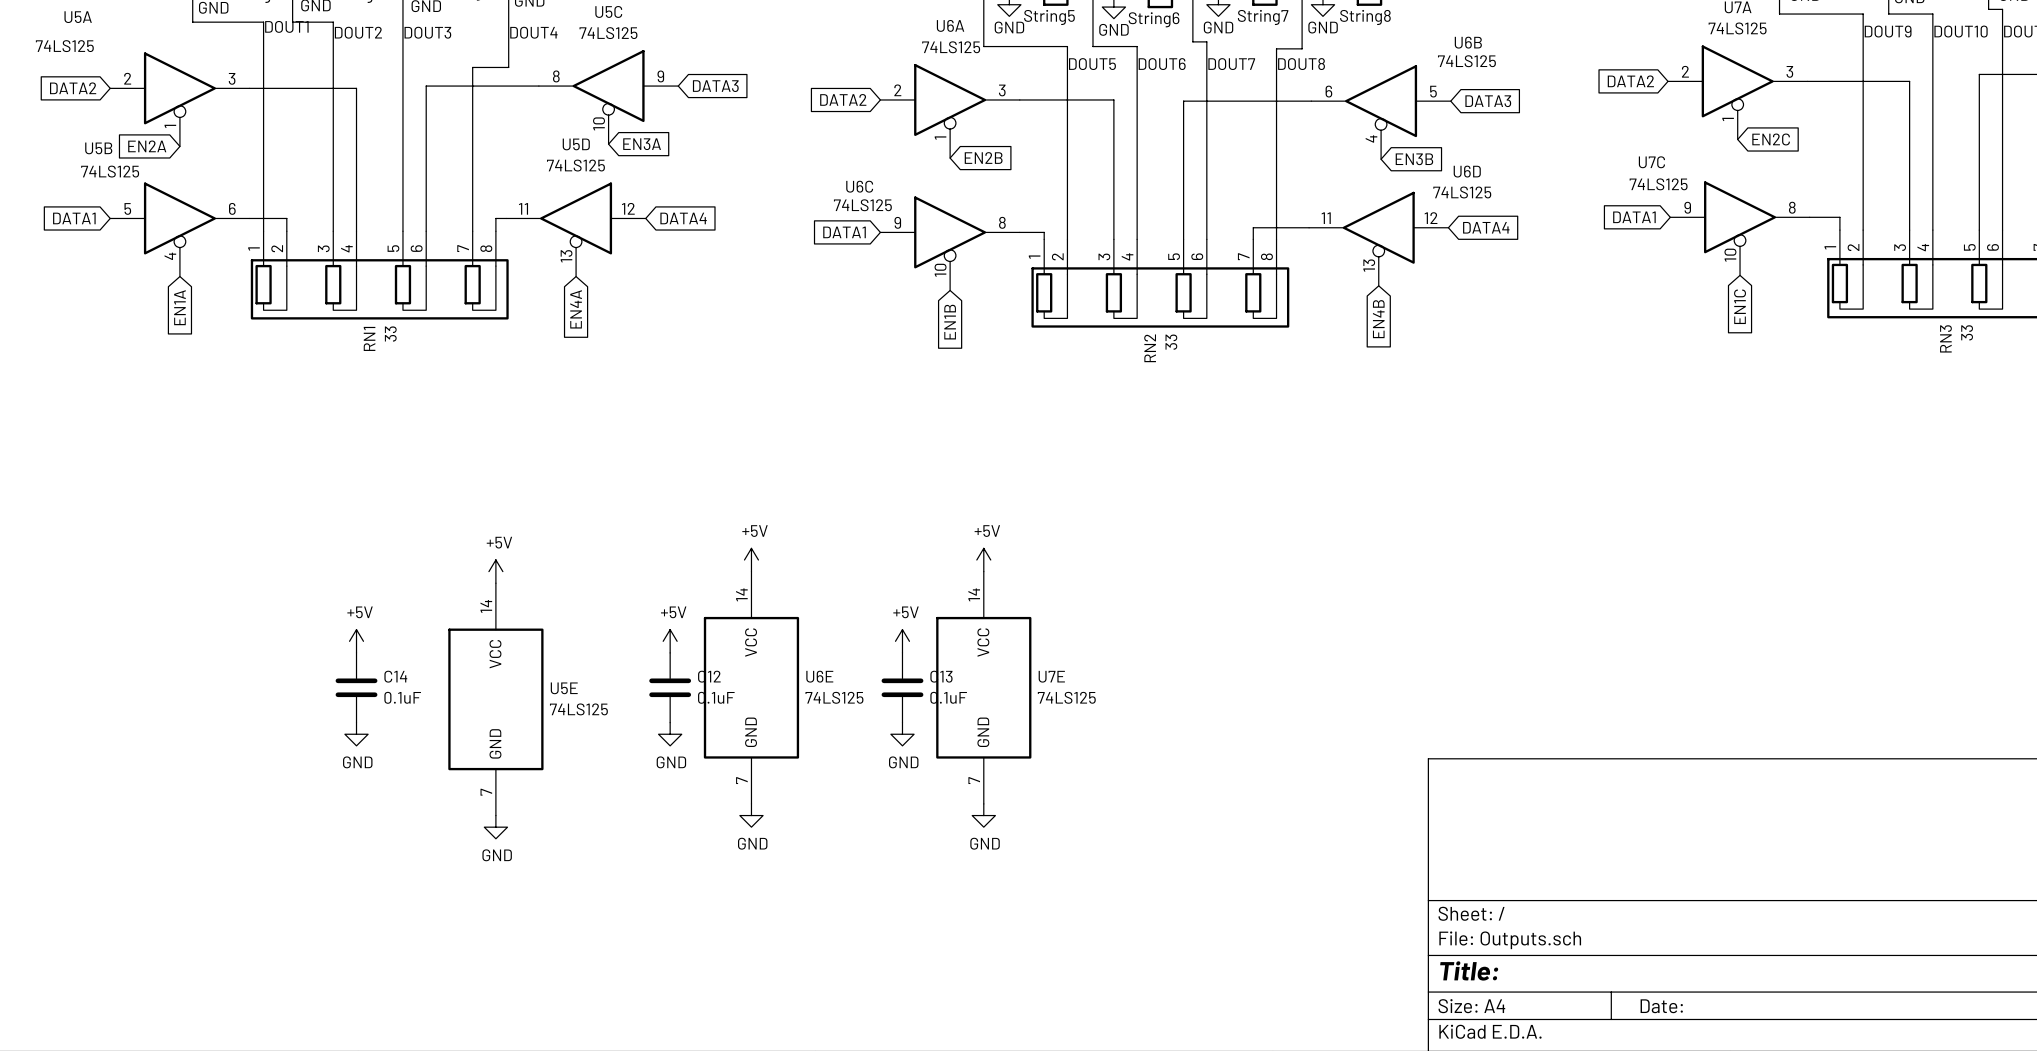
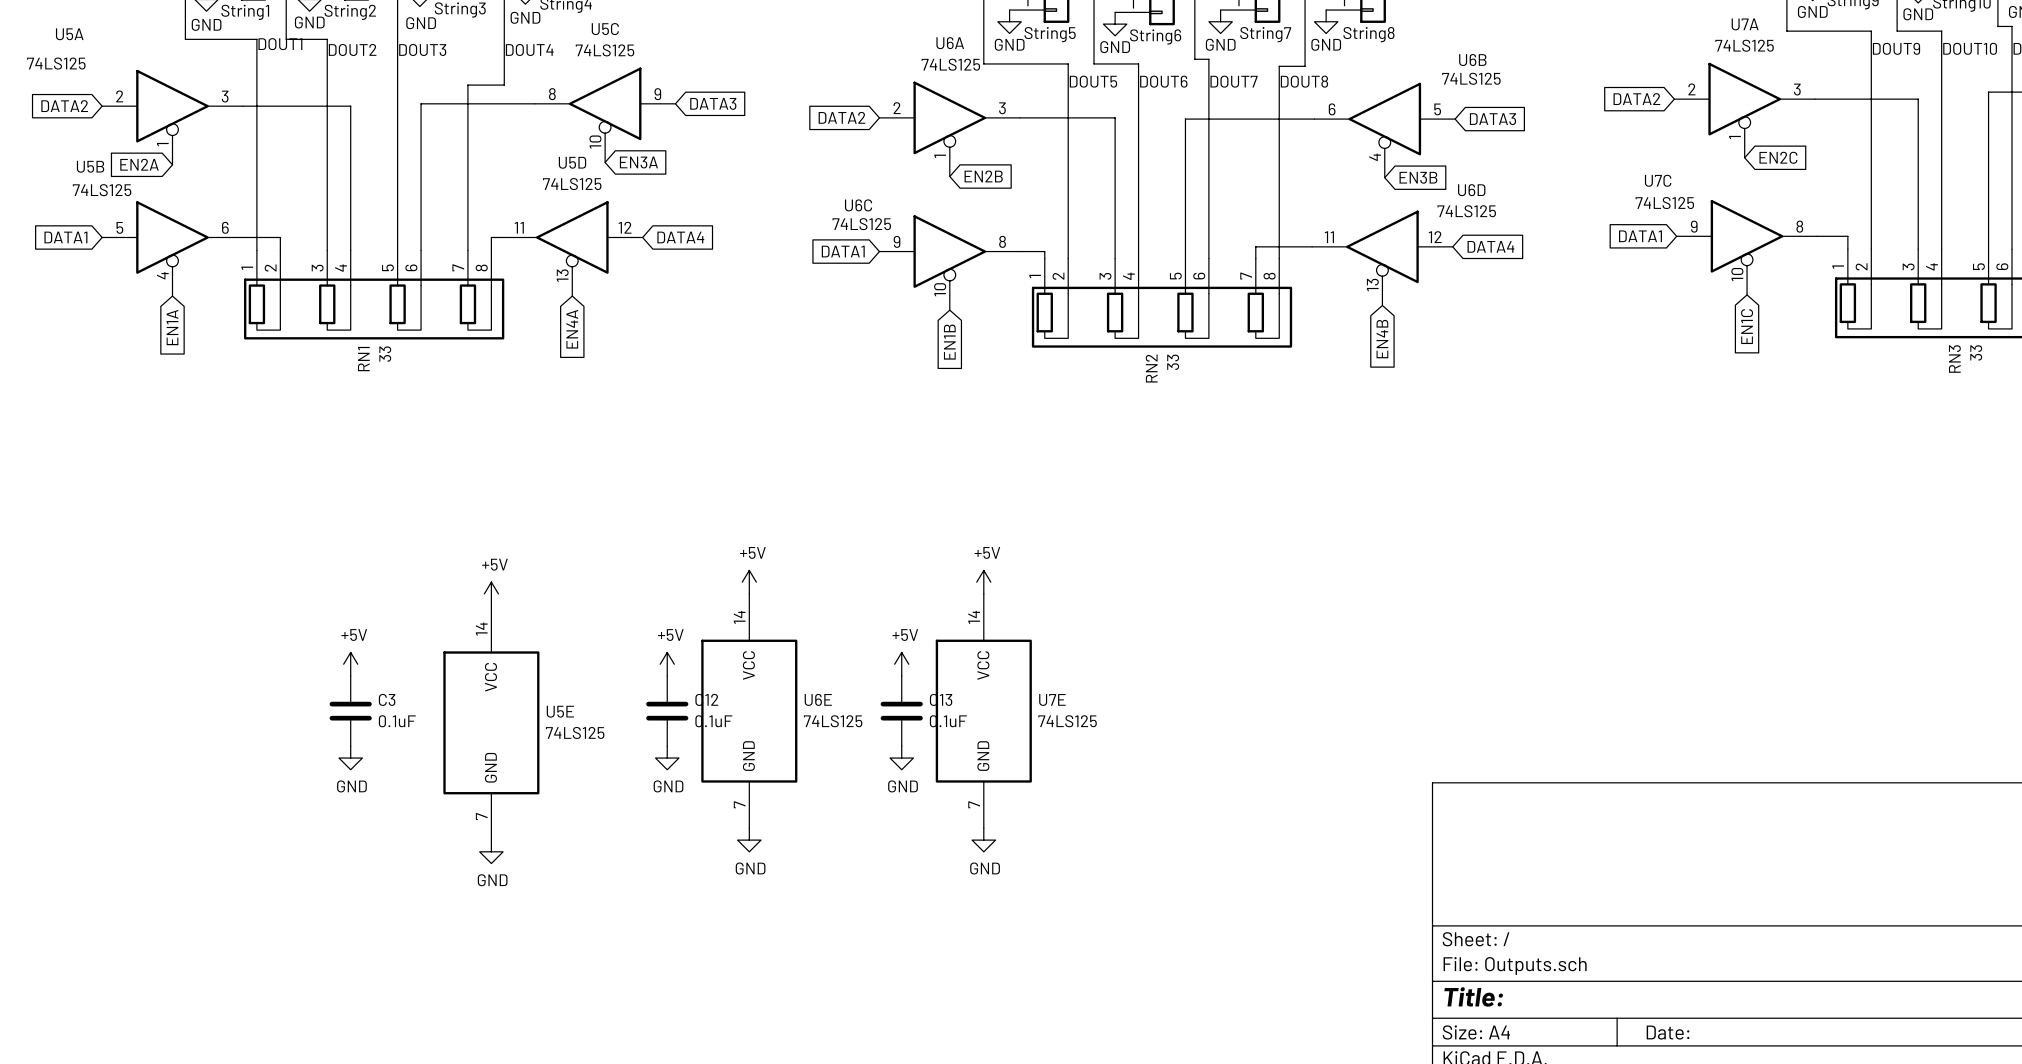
C14 name: C14 (395, 676) -> C3 (387, 699)

